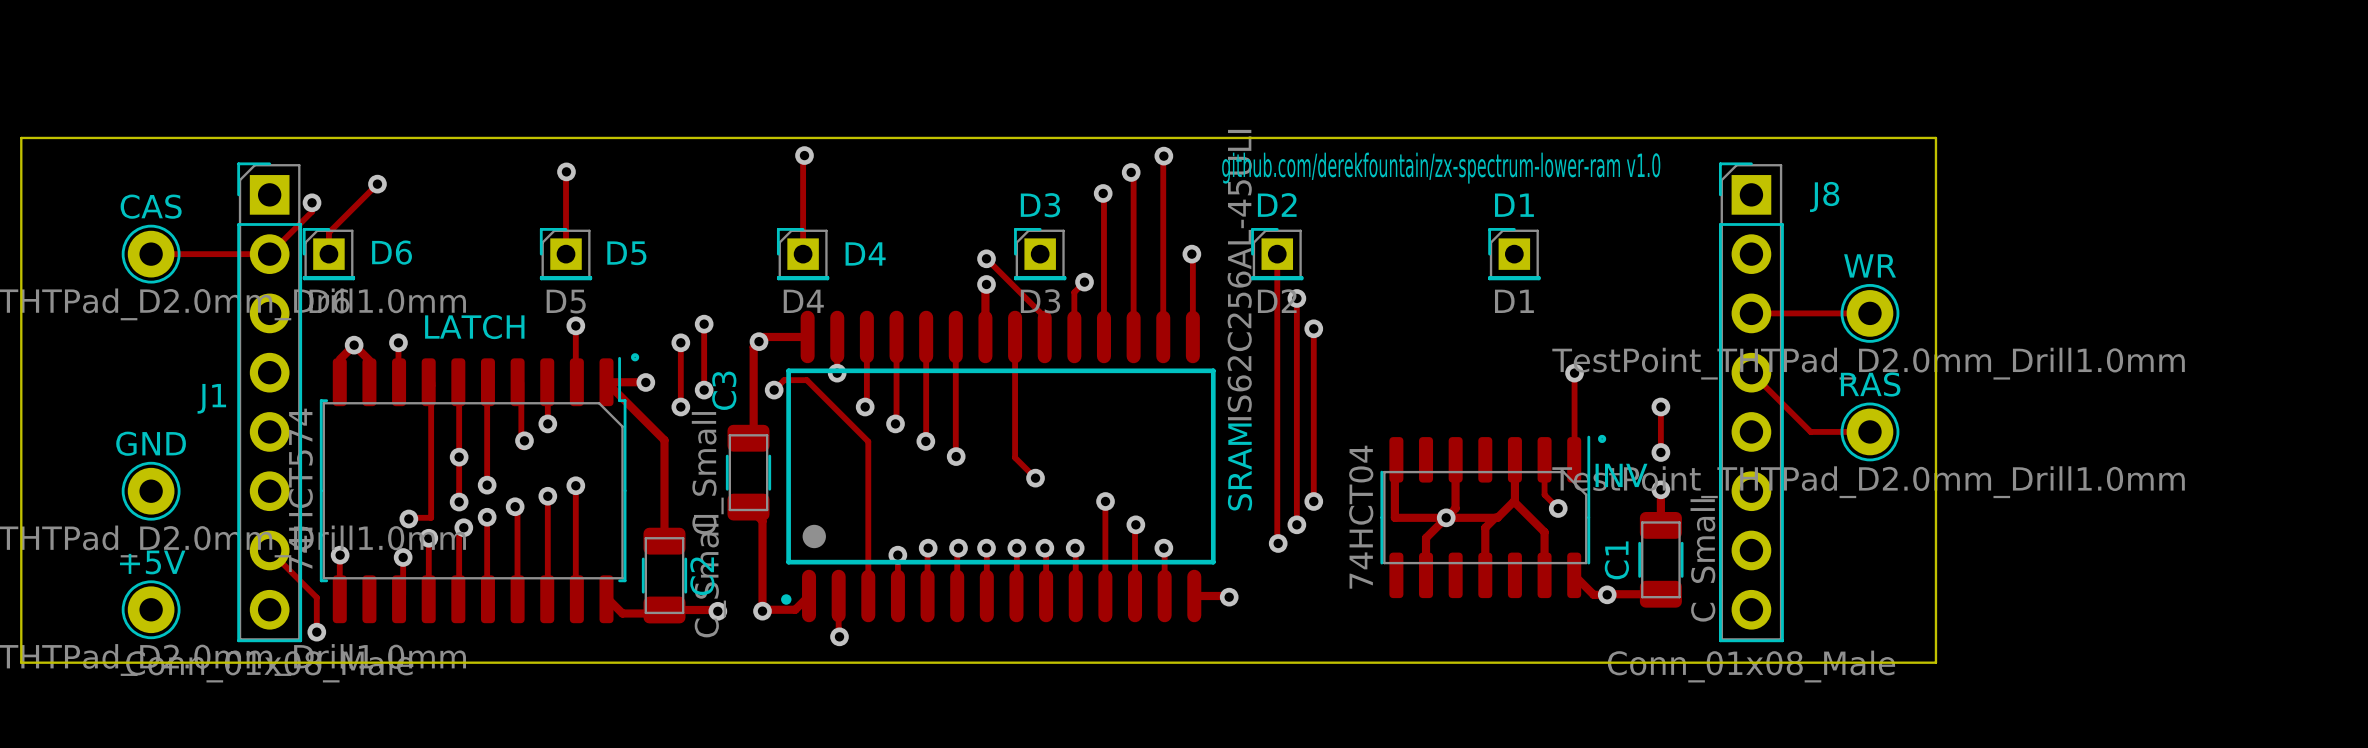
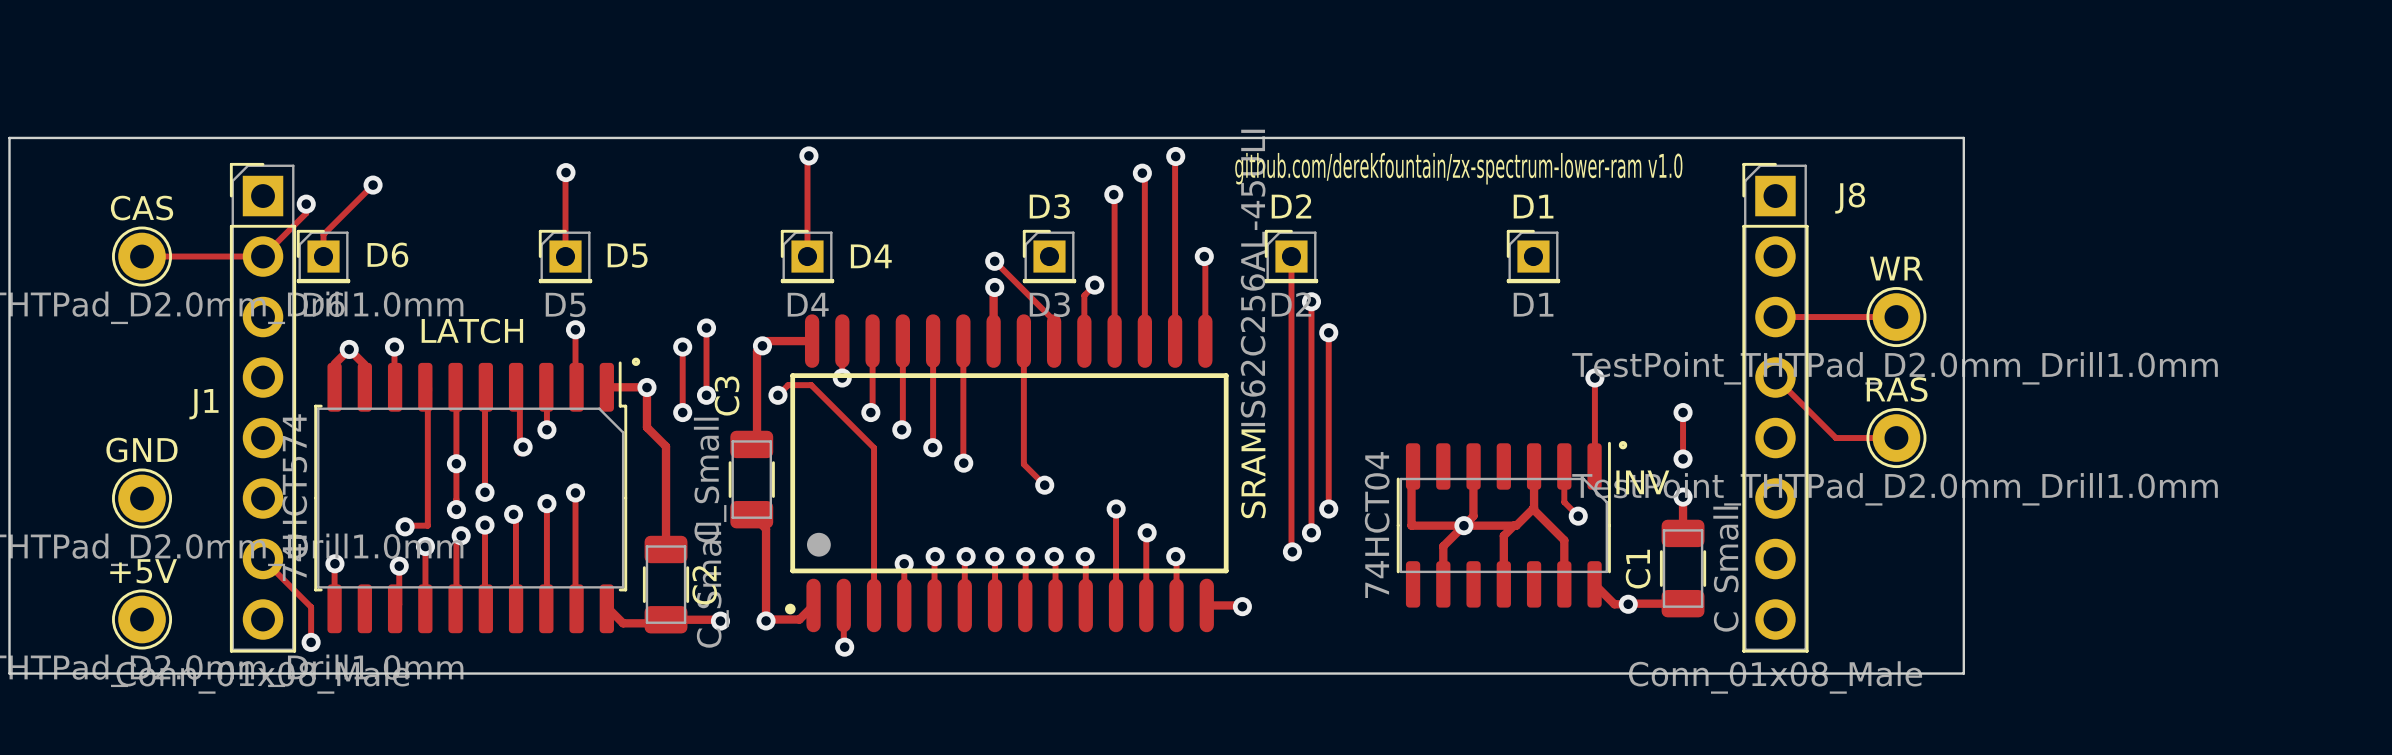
track: (606, 382) (645, 421) -> (646, 387) (646, 427)

